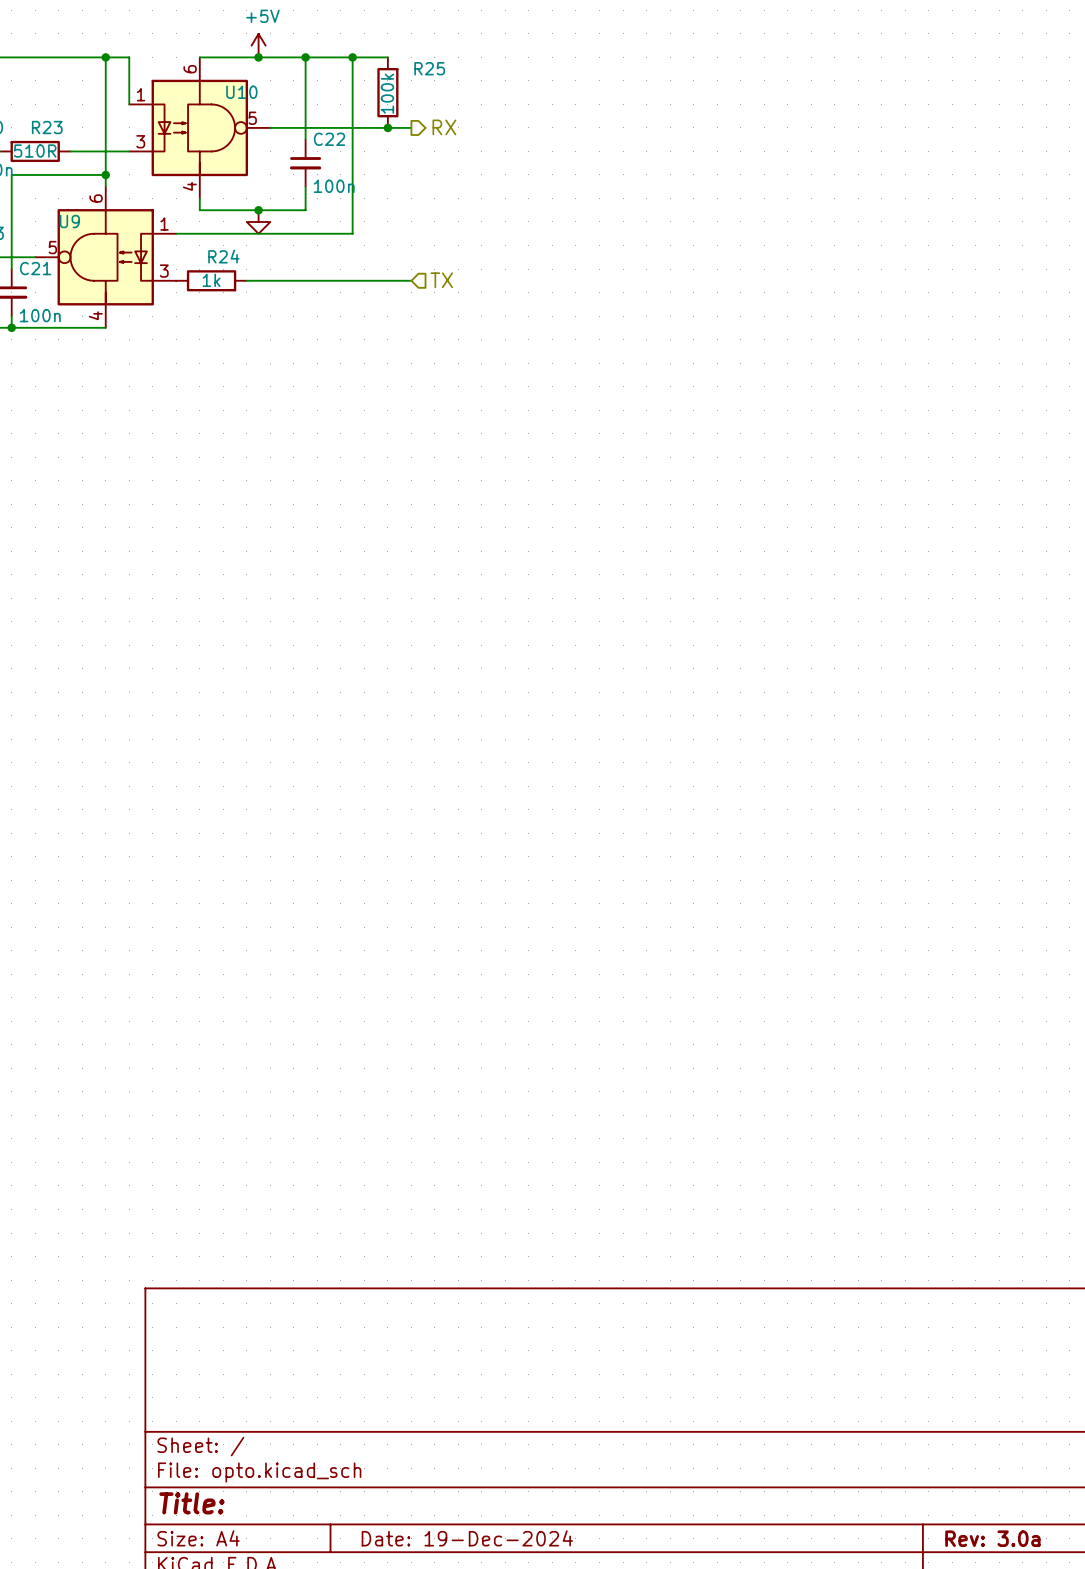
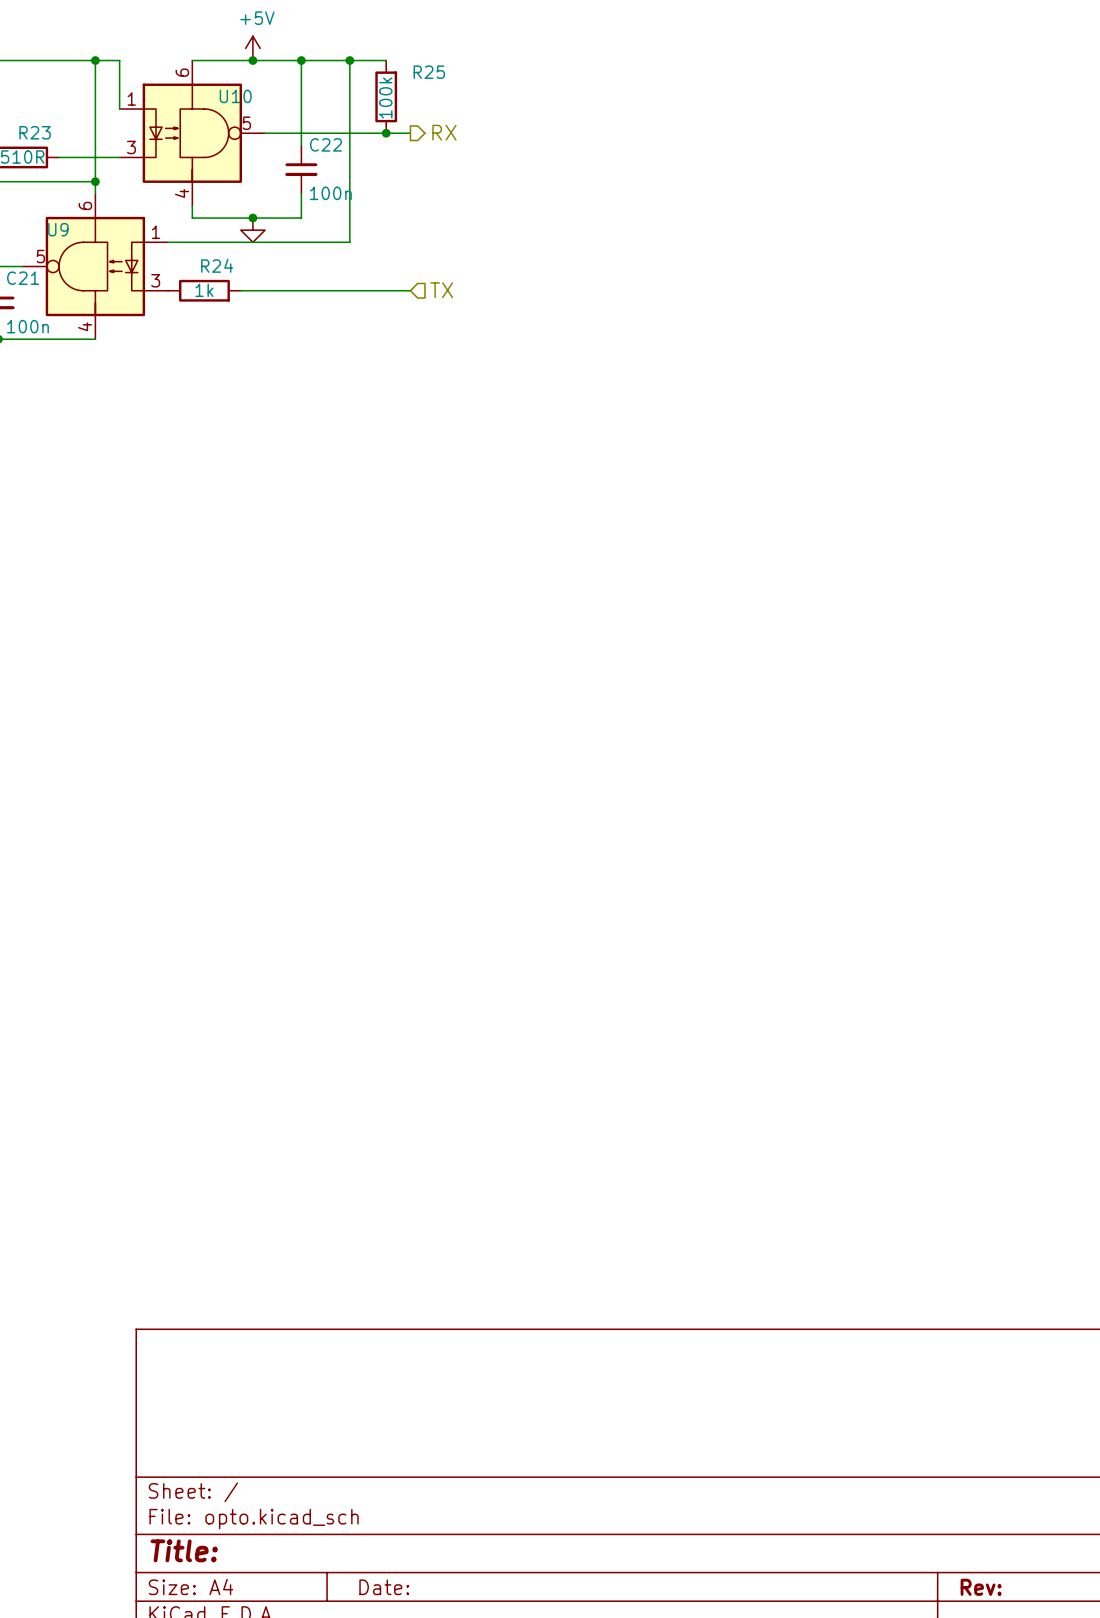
title block: Date: 19-Dec-2024 (467, 1538) -> Date: (384, 1587)
title block: Rev: 3.0a (992, 1538) -> Rev: (981, 1587)

